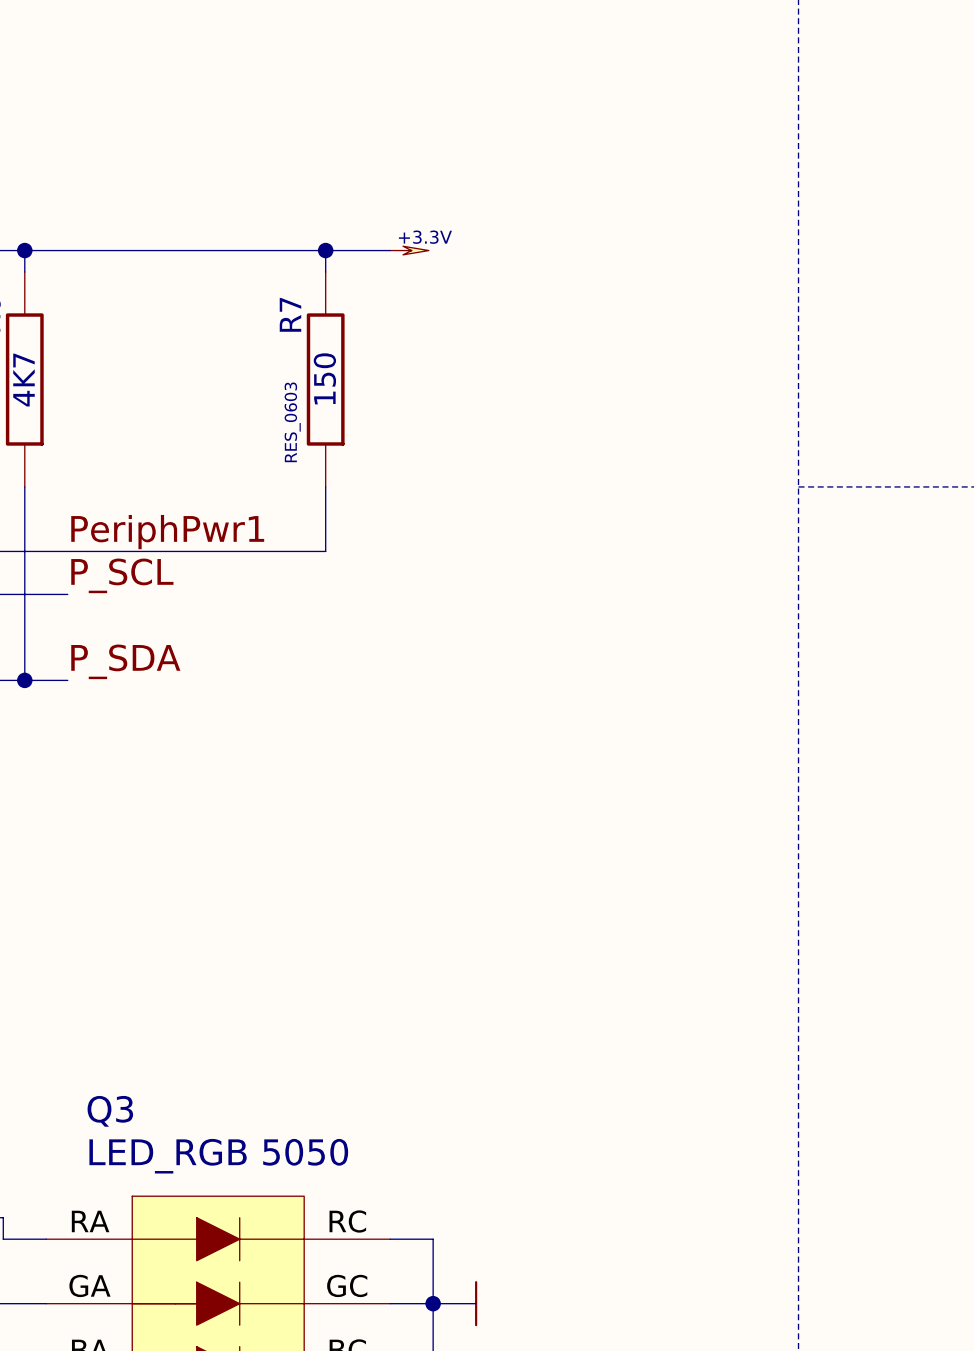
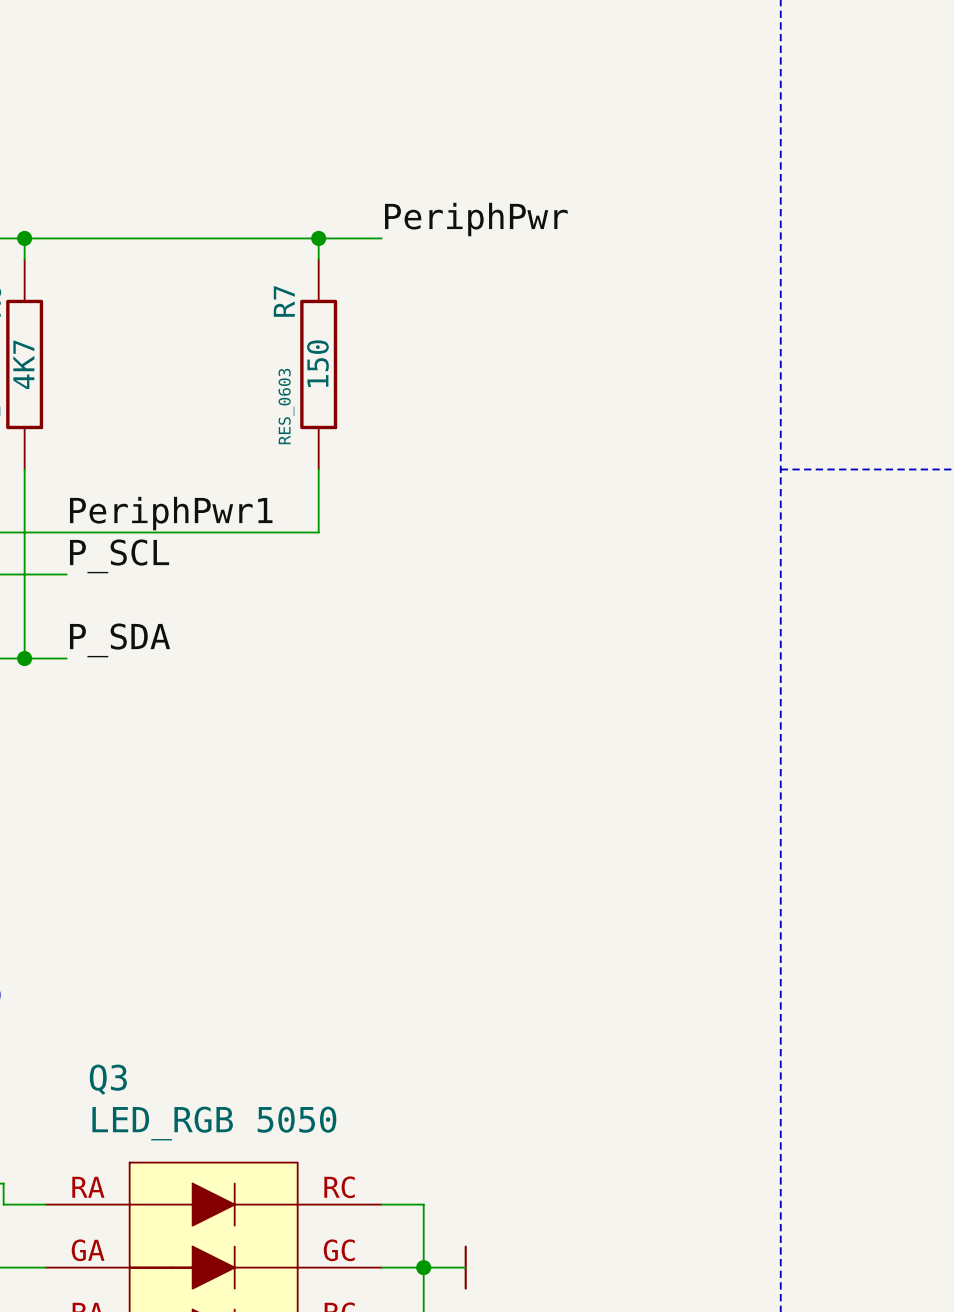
label: none -> PeriphPwr (476, 219)
power symbol: +3.3V (409, 250) -> none

